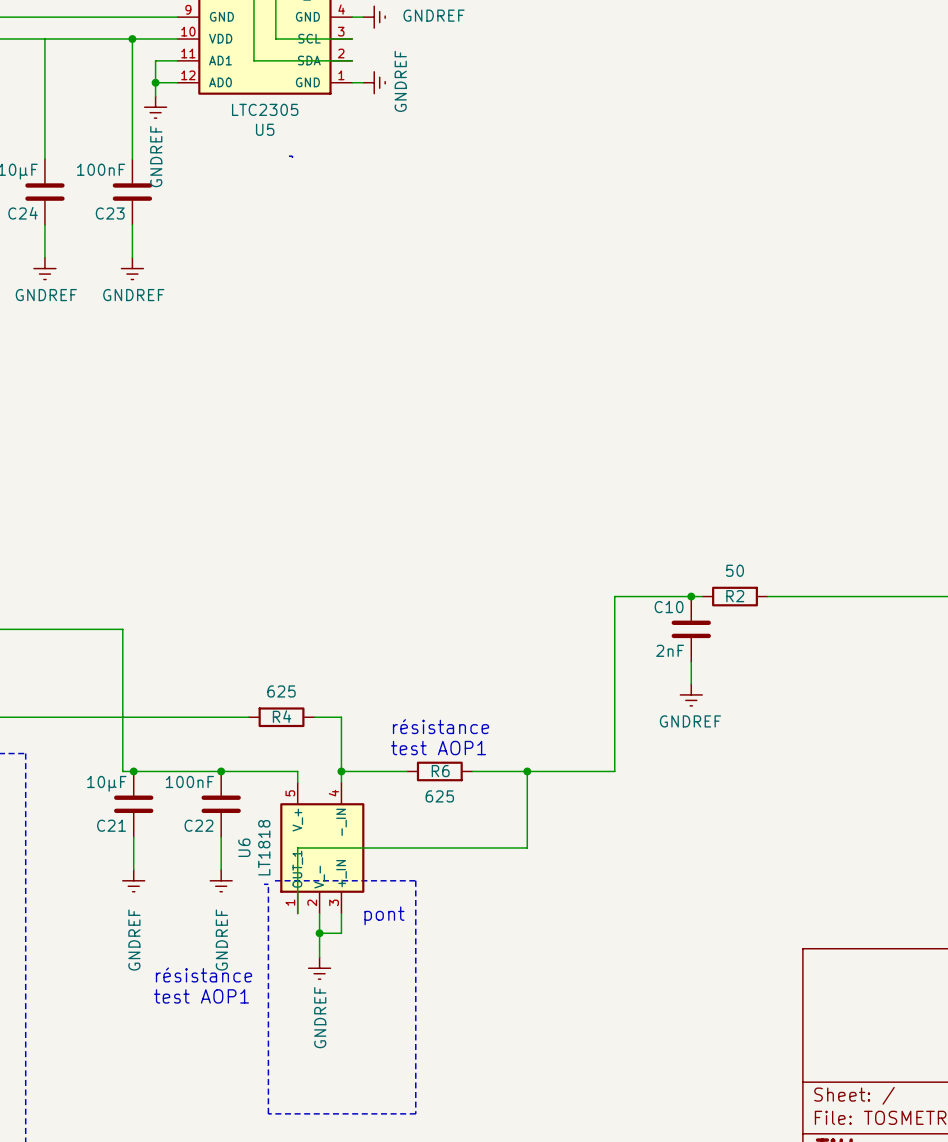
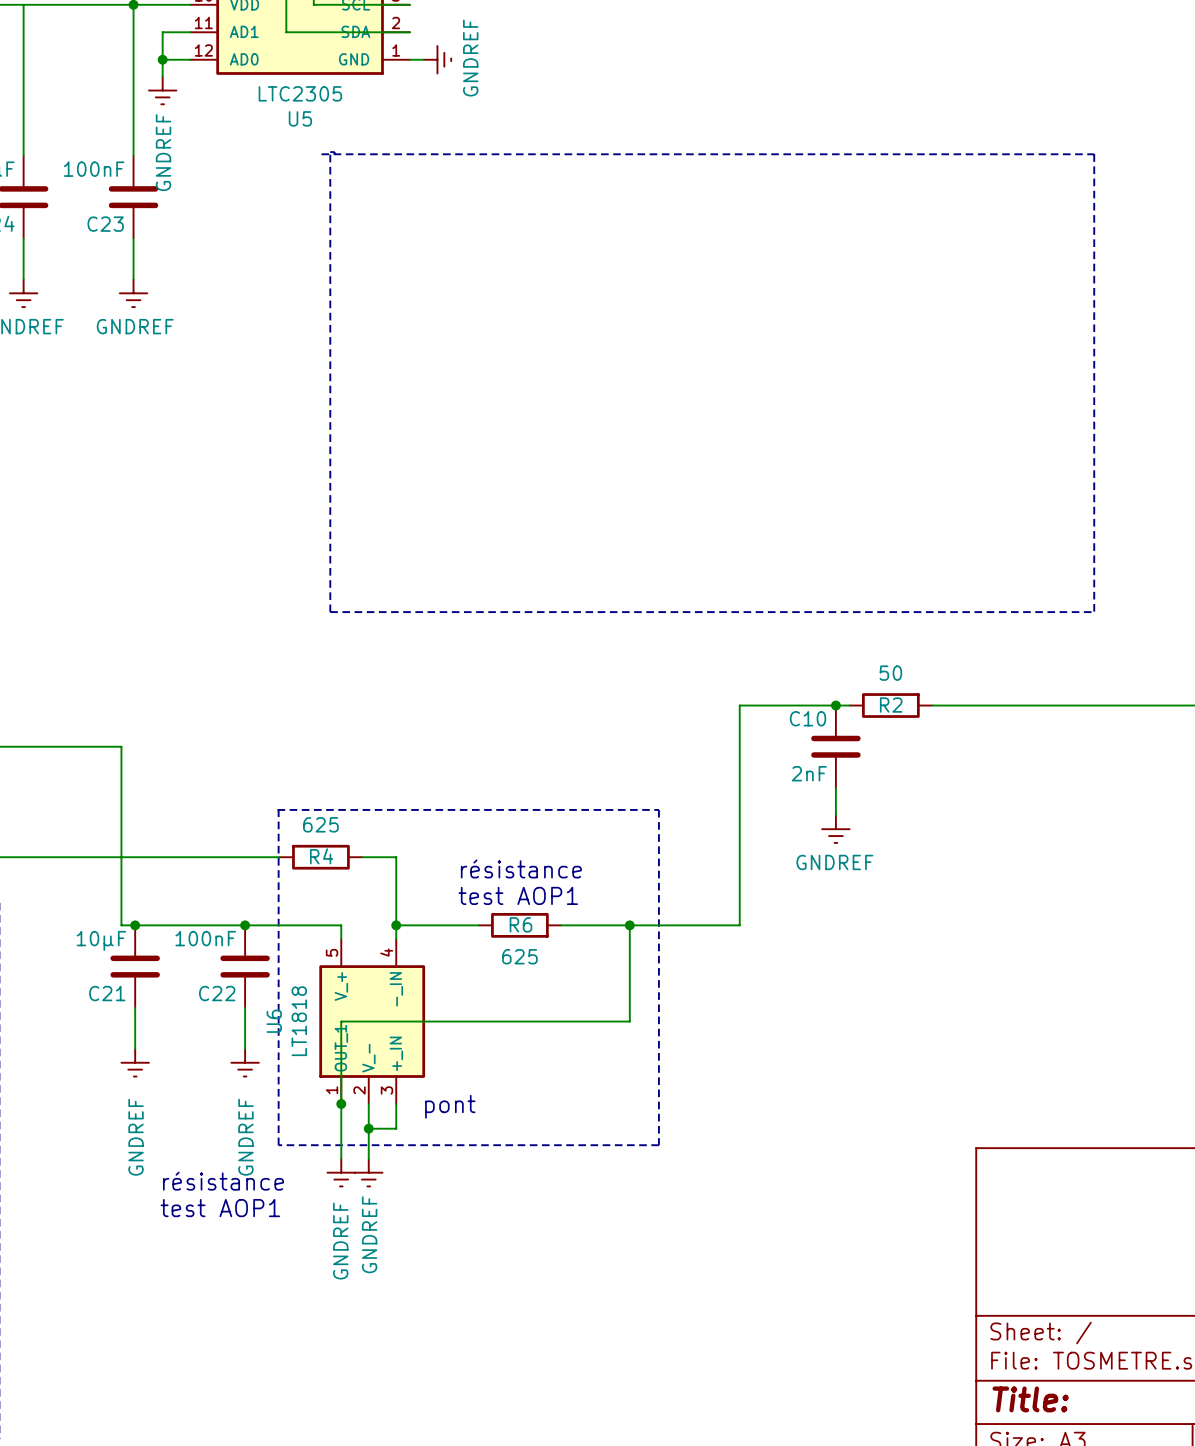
line: none -> (330, 152) (330, 612) (1094, 612) (1094, 154) (321, 154)
line: none -> (277, 809) (658, 809) (658, 1145) (278, 1145) (278, 809)
line: (274, 880) (415, 880) (415, 1113) (268, 1113) (268, 884) (264, 884) -> none
wire: none -> (341, 1103) (341, 1158)
junction: none -> (341, 1103)
power symbol: none -> GNDREF (341, 1172)

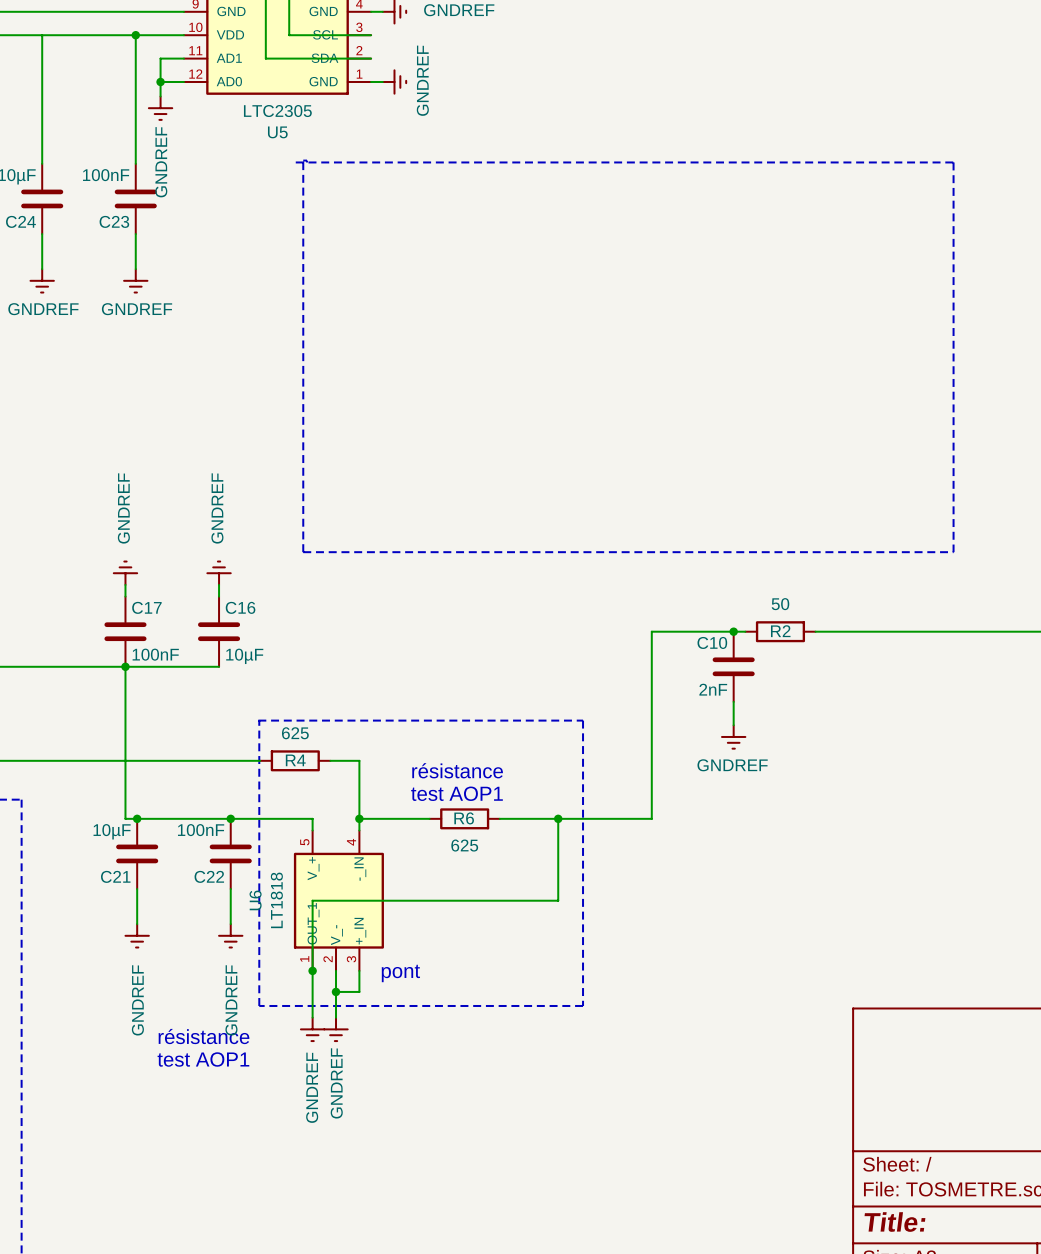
power symbol: none -> GNDREF (125, 573)
power symbol: none -> GNDREF (219, 573)
wire: none -> (125, 584) (125, 596)
wire: none -> (219, 584) (219, 596)
C17: none -> 100nF (125, 631)
C16: none -> 10µF (219, 631)
wire: none -> (125, 666) (219, 666)
junction: none -> (125, 666)

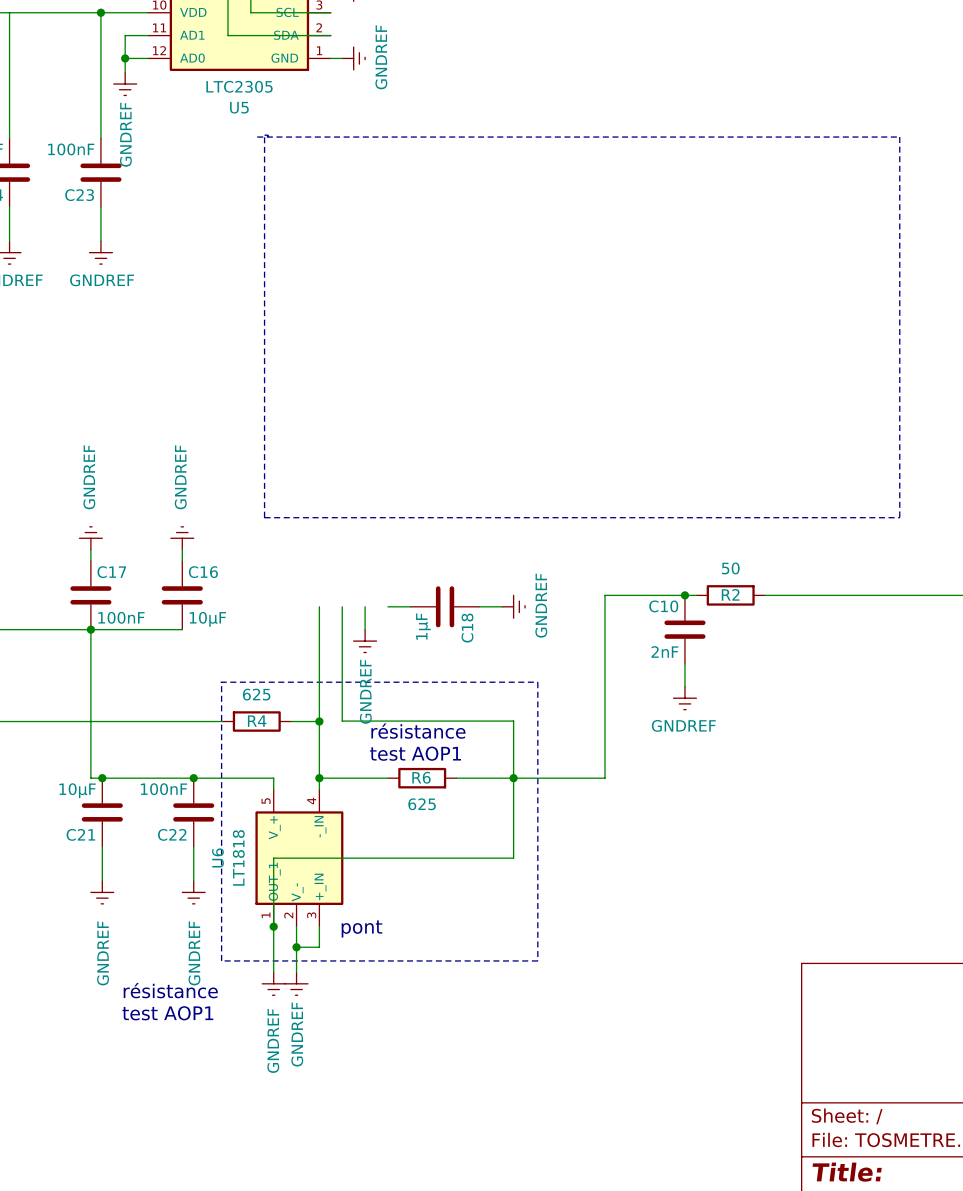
wire: none -> (319, 606) (319, 721)
wire: none -> (342, 606) (342, 721) (513, 721) (513, 778)
wire: none -> (365, 606) (365, 629)
wire: none -> (387, 606) (410, 606)
C18: none -> 1µF (445, 606)
wire: none -> (479, 606) (502, 606)
power symbol: none -> GNDREF (513, 606)
power symbol: none -> GNDREF (365, 641)
junction: none -> (319, 721)

